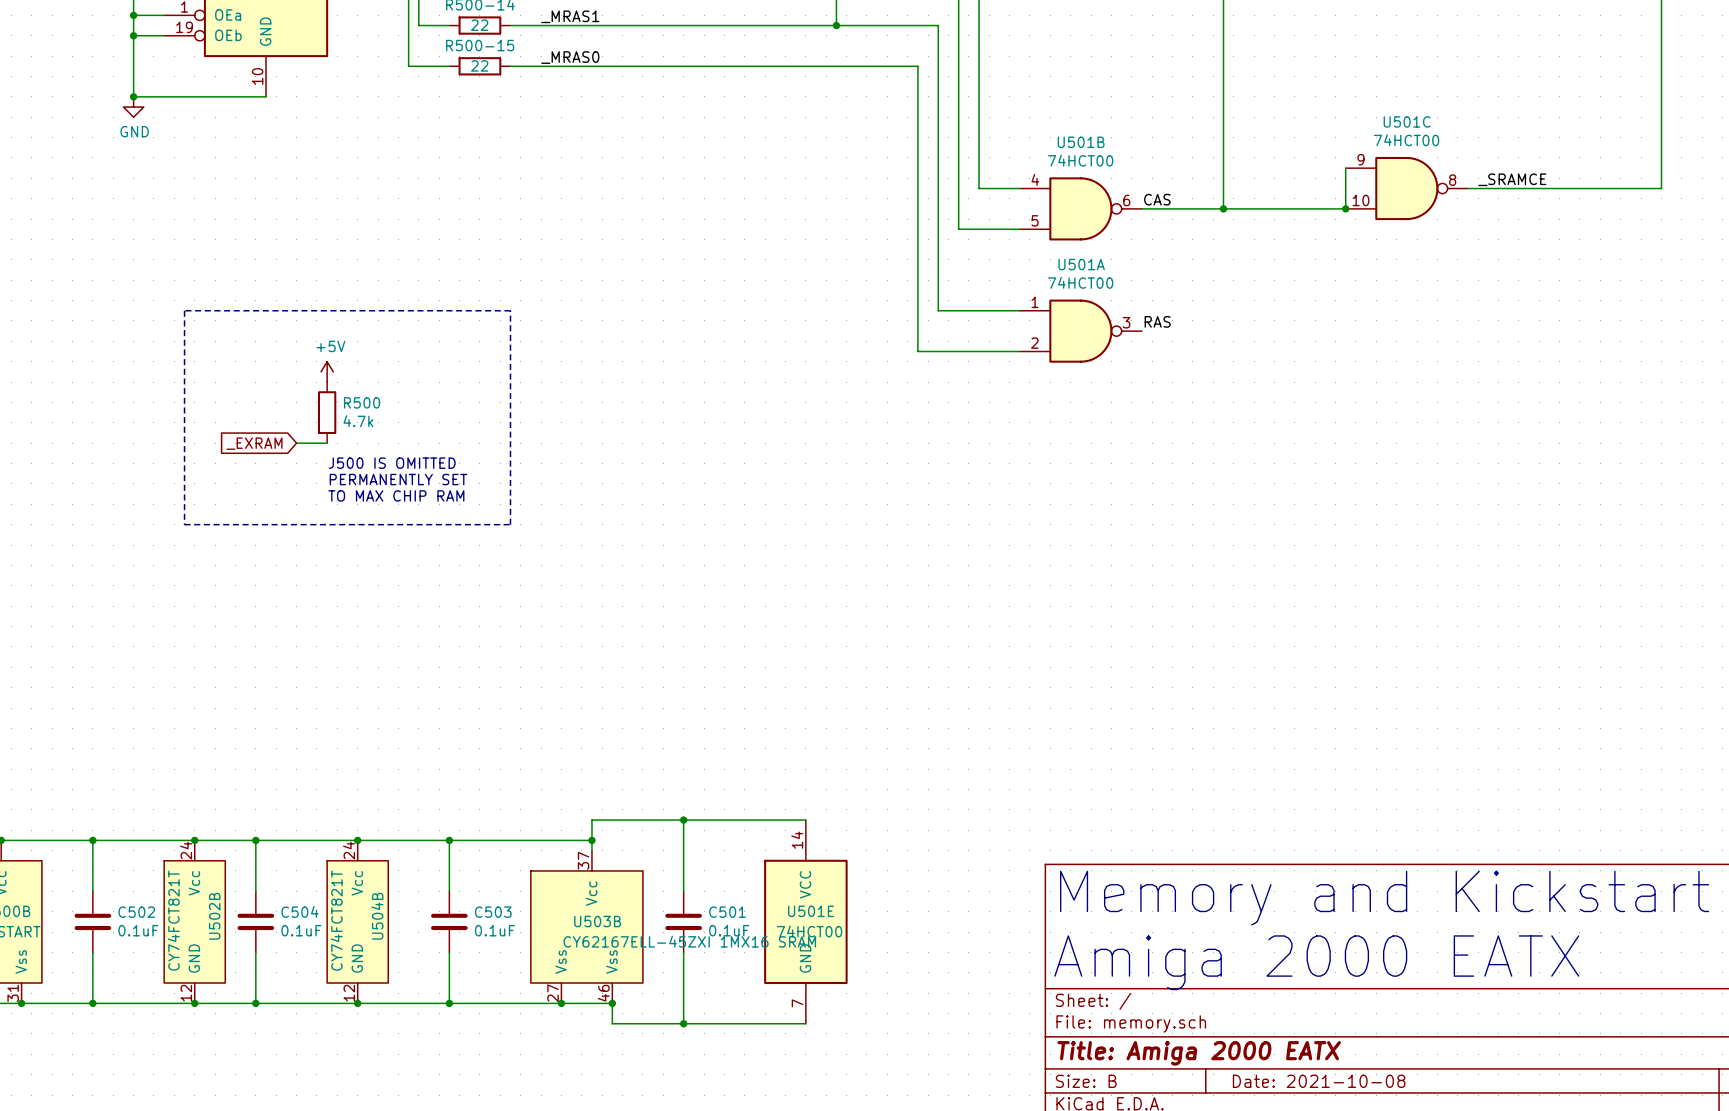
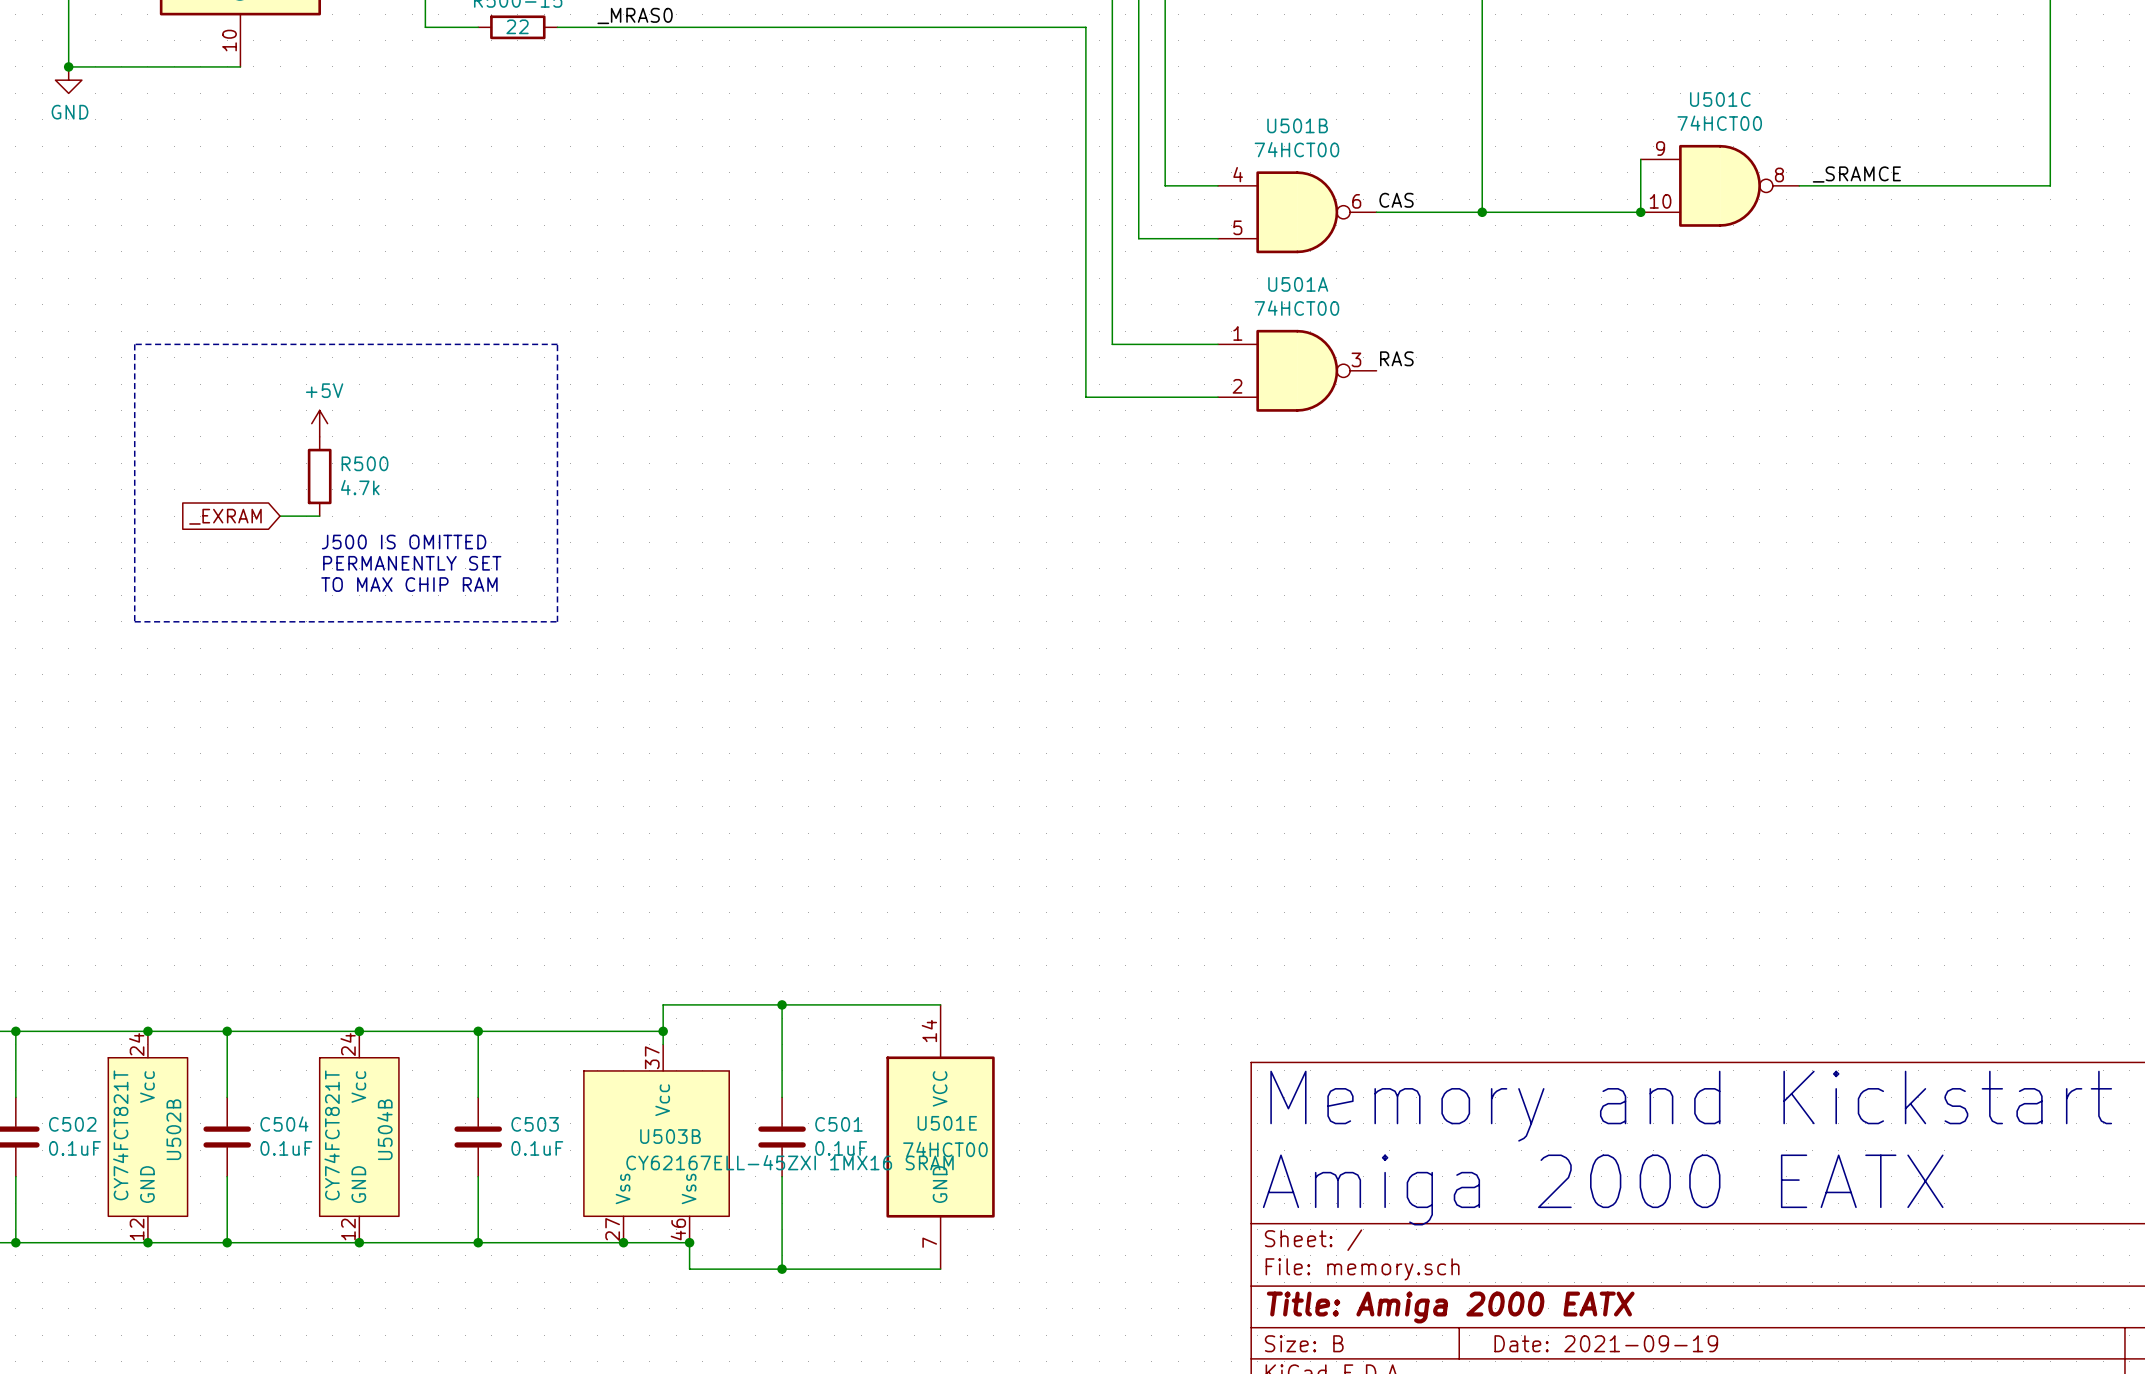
title block: Date: 2021-10-08 (1319, 1081) -> Date: 2021-09-19 (1606, 1343)

